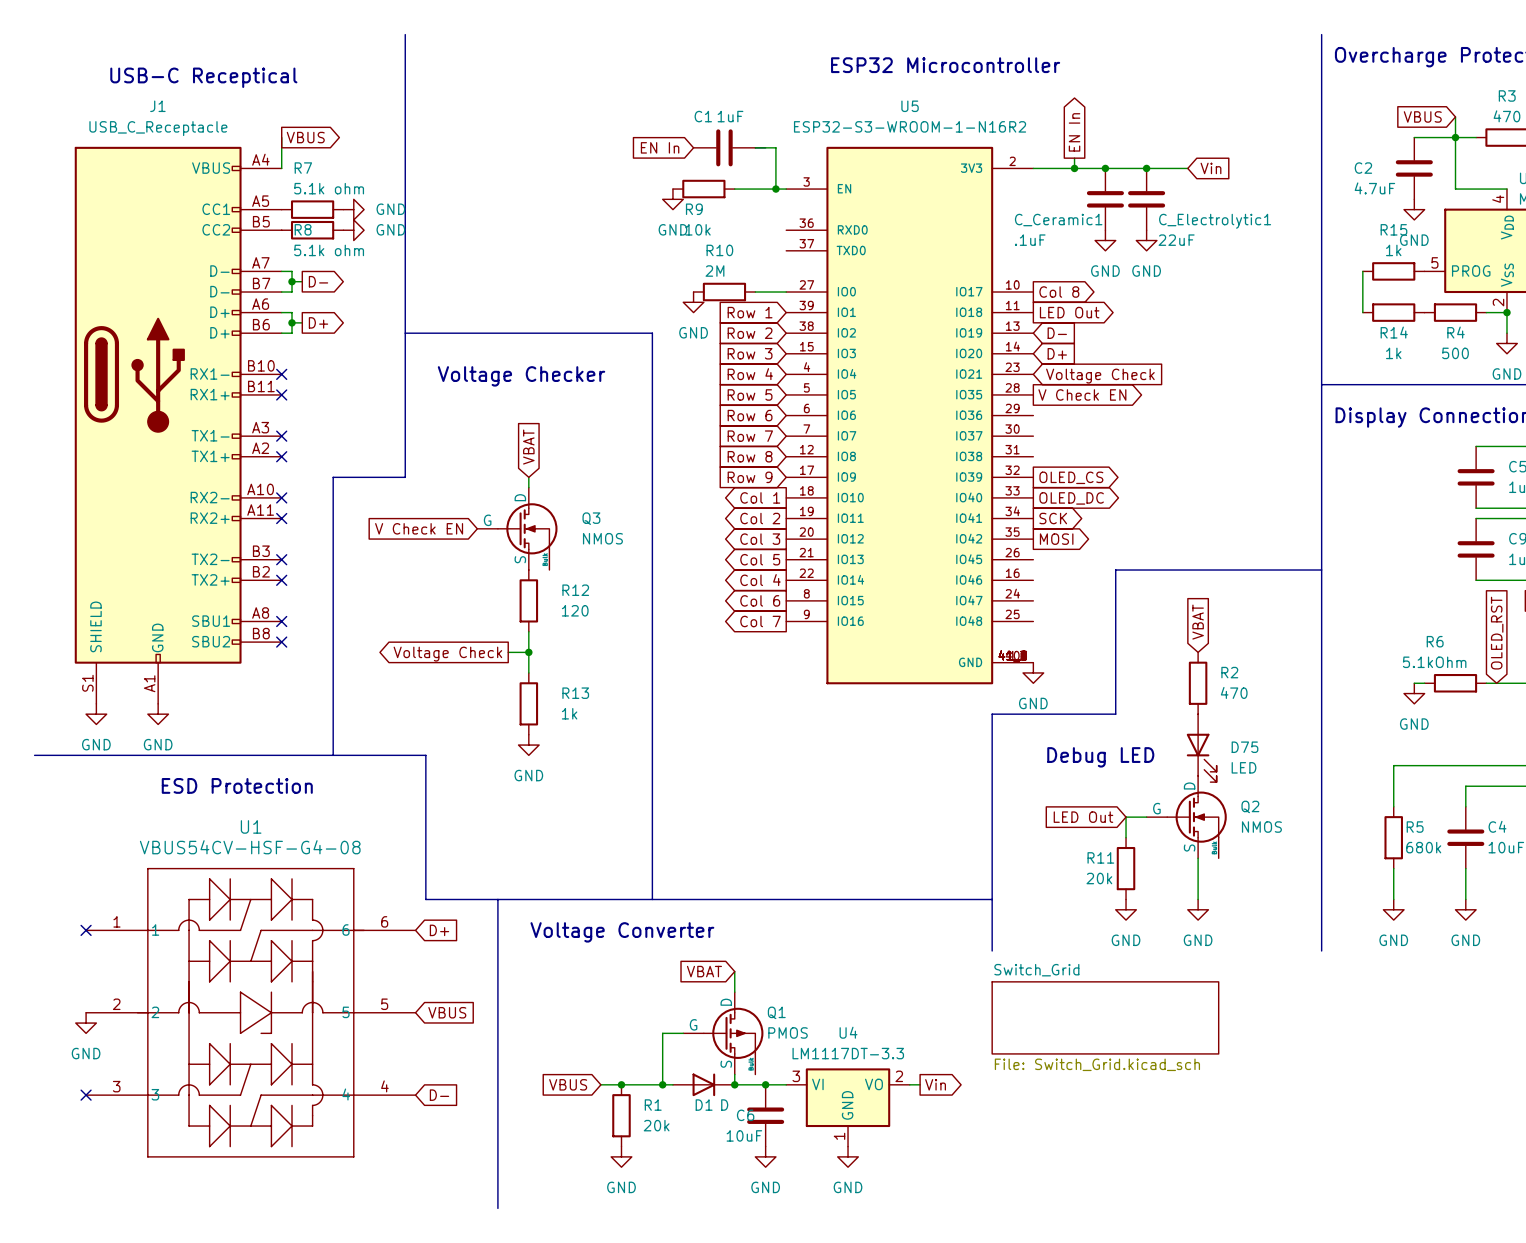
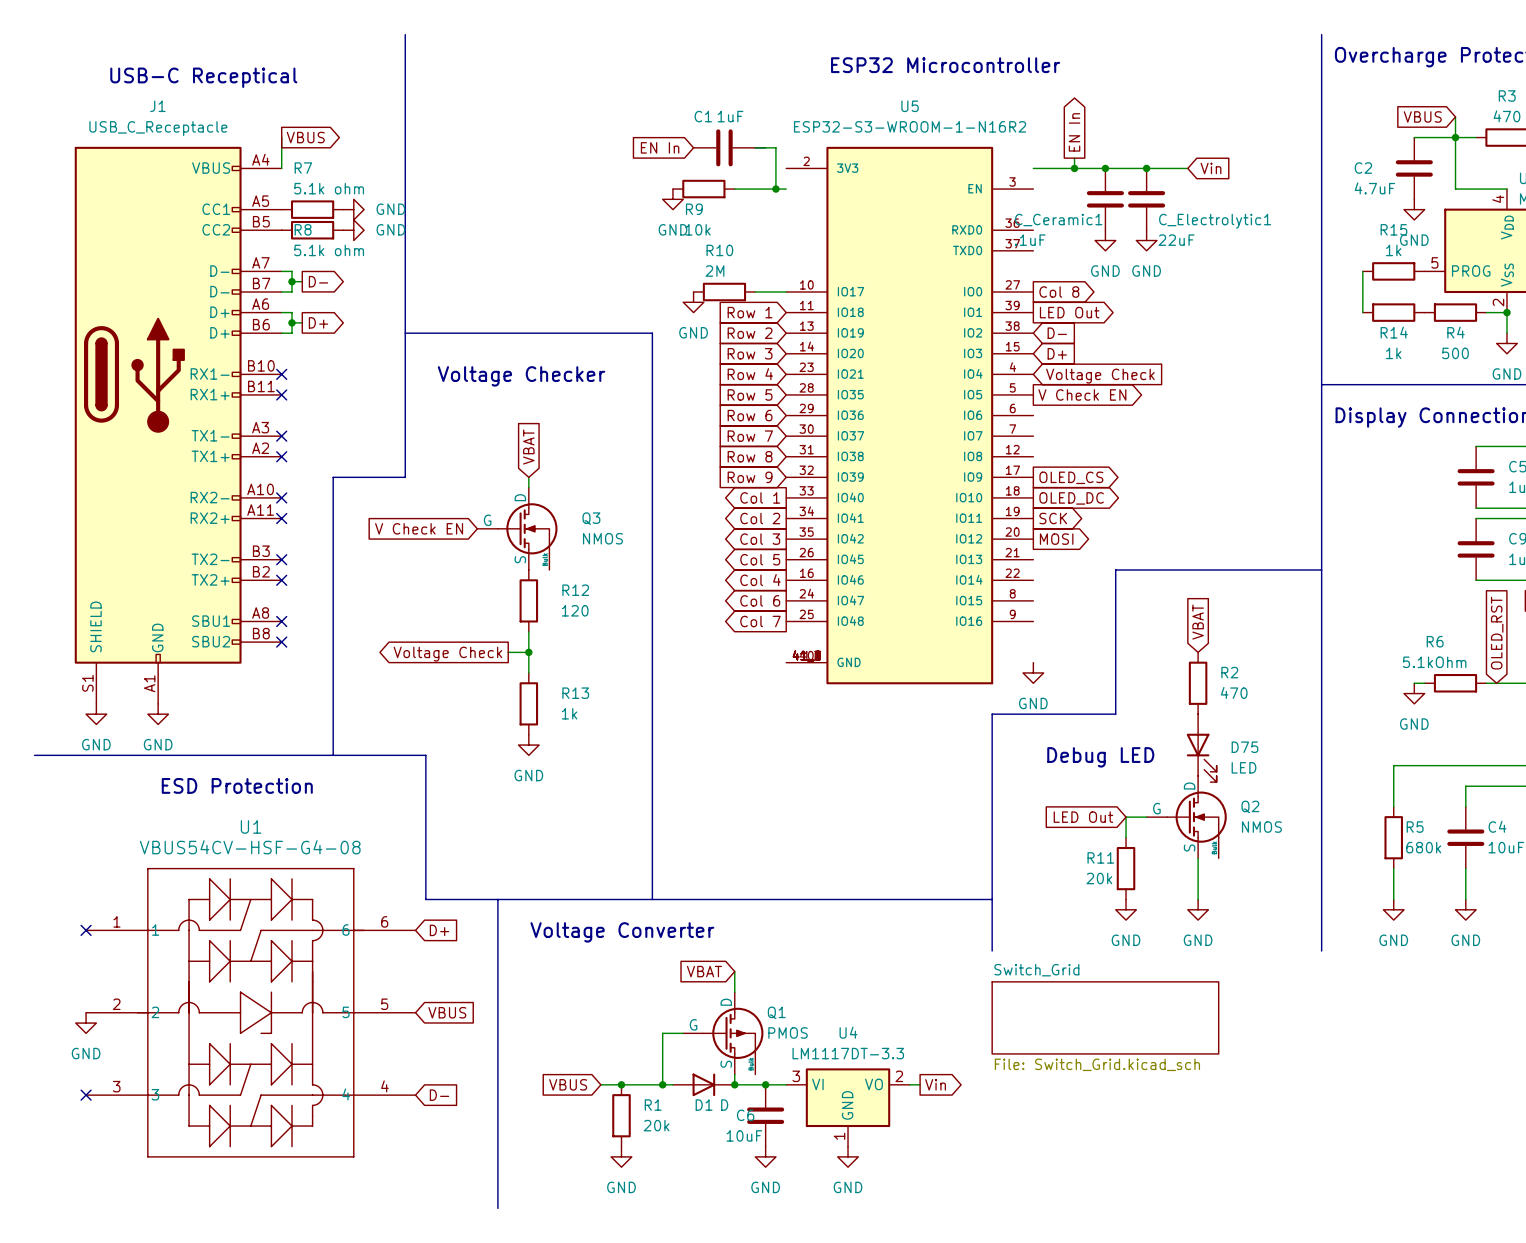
U5 flip: as is (909, 415) -> left-right (909, 415)

